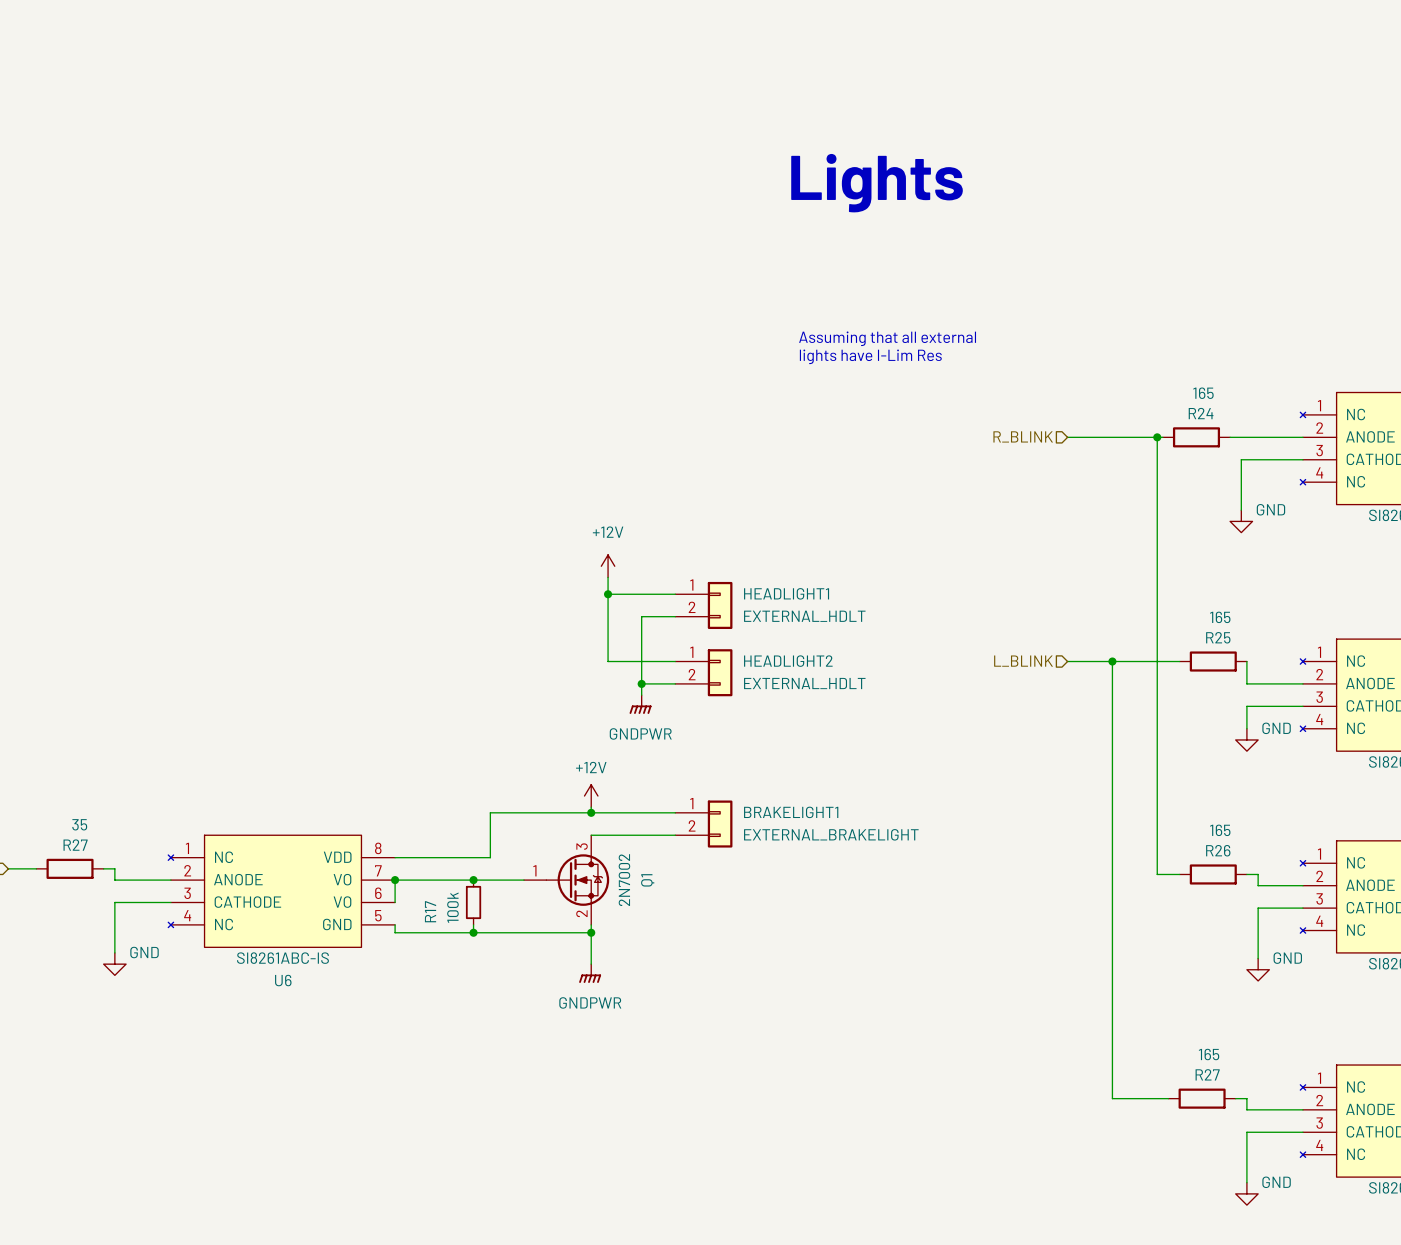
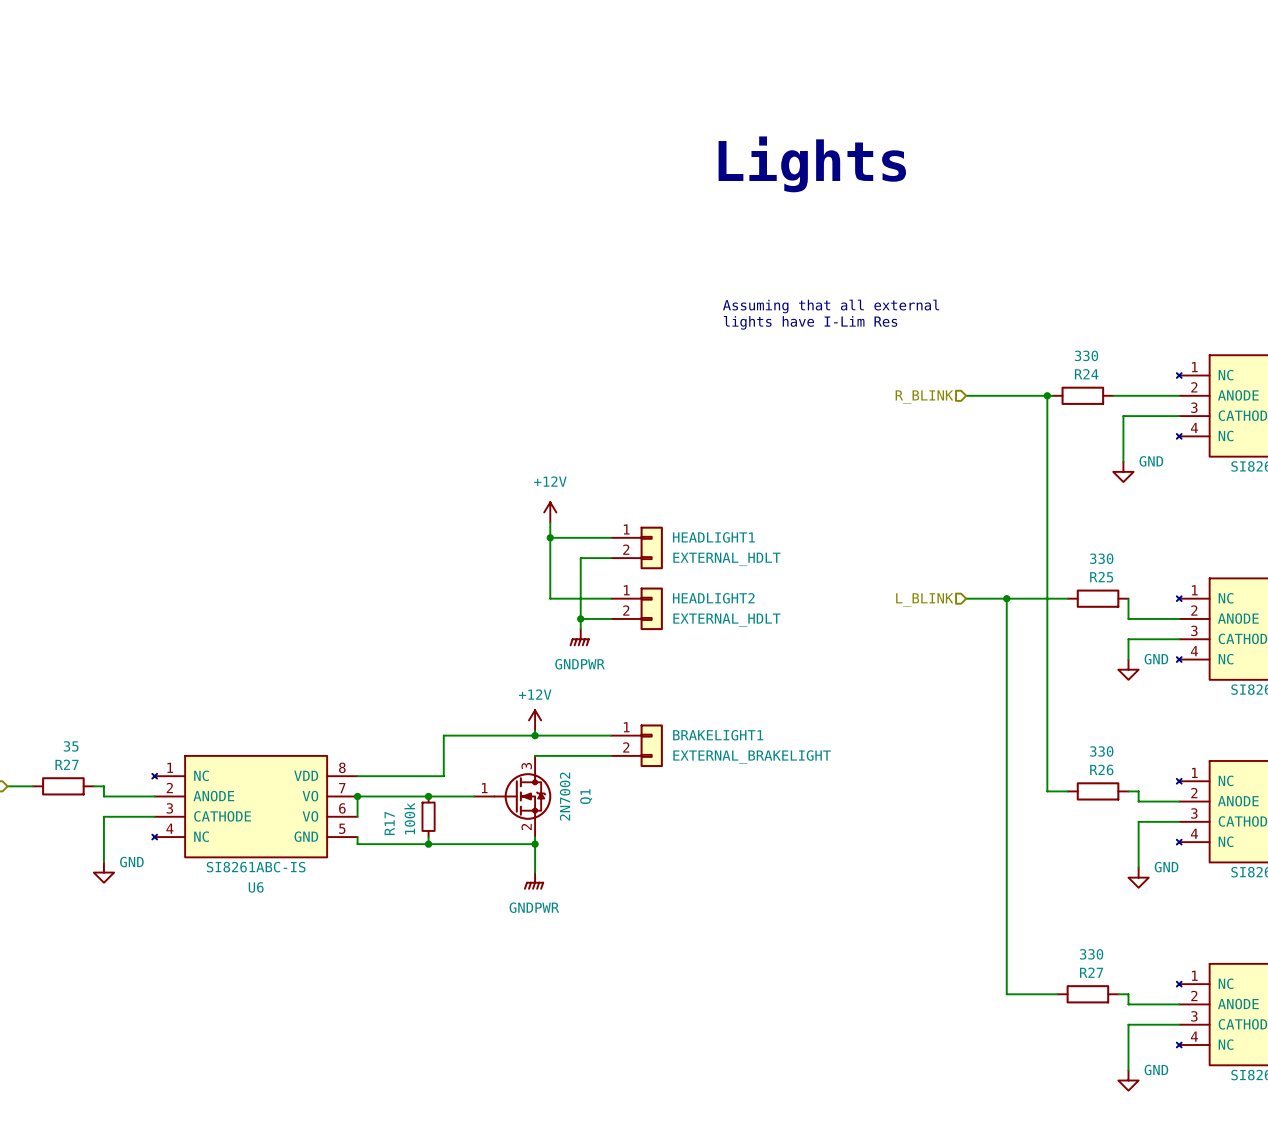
R24 value: 165 (1203, 393) -> 330 (1086, 355)
R25 value: 165 (1220, 617) -> 330 (1101, 558)
R26 value: 165 (1220, 830) -> 330 (1101, 751)
R27 value: 165 (1209, 1054) -> 330 (1091, 954)

